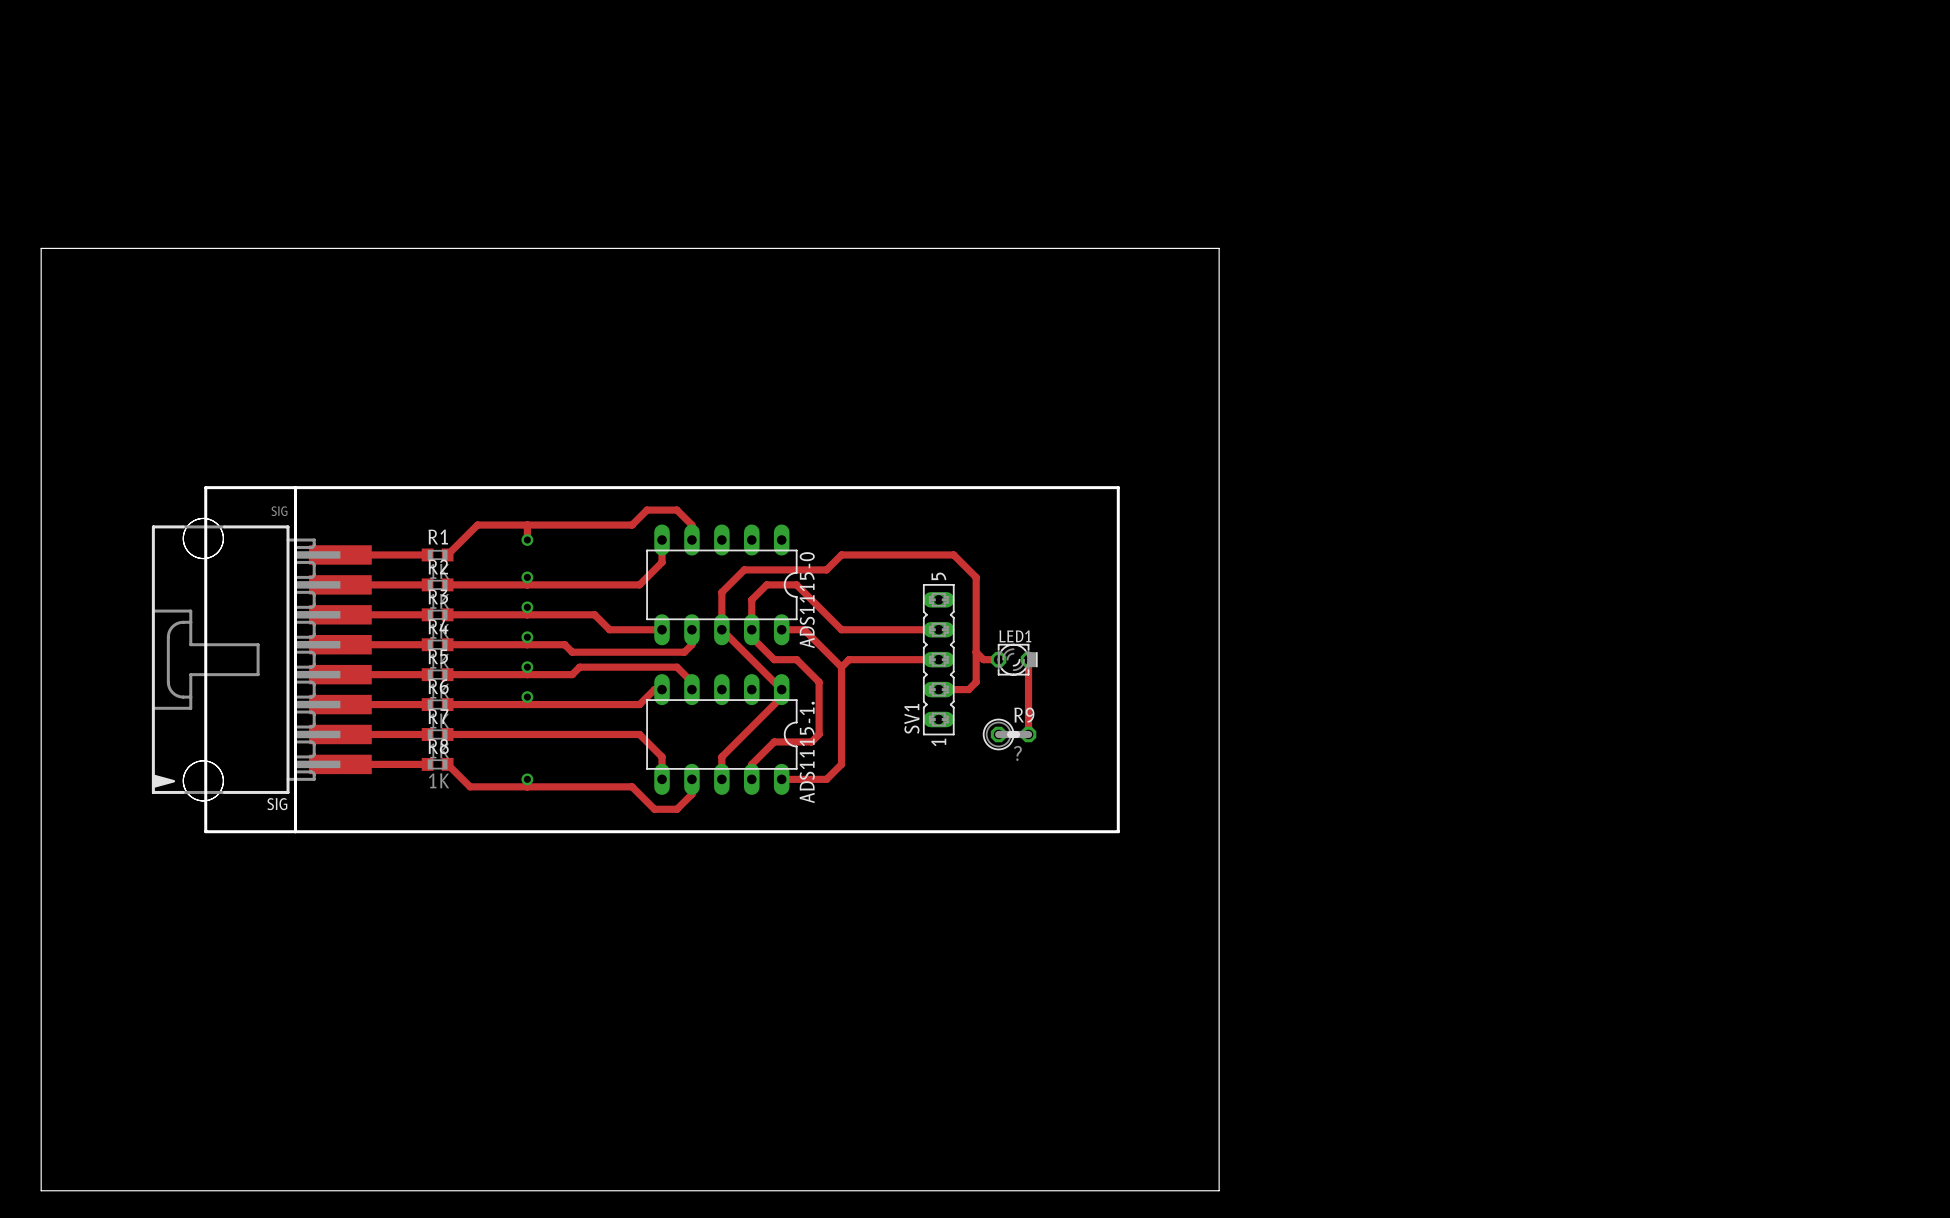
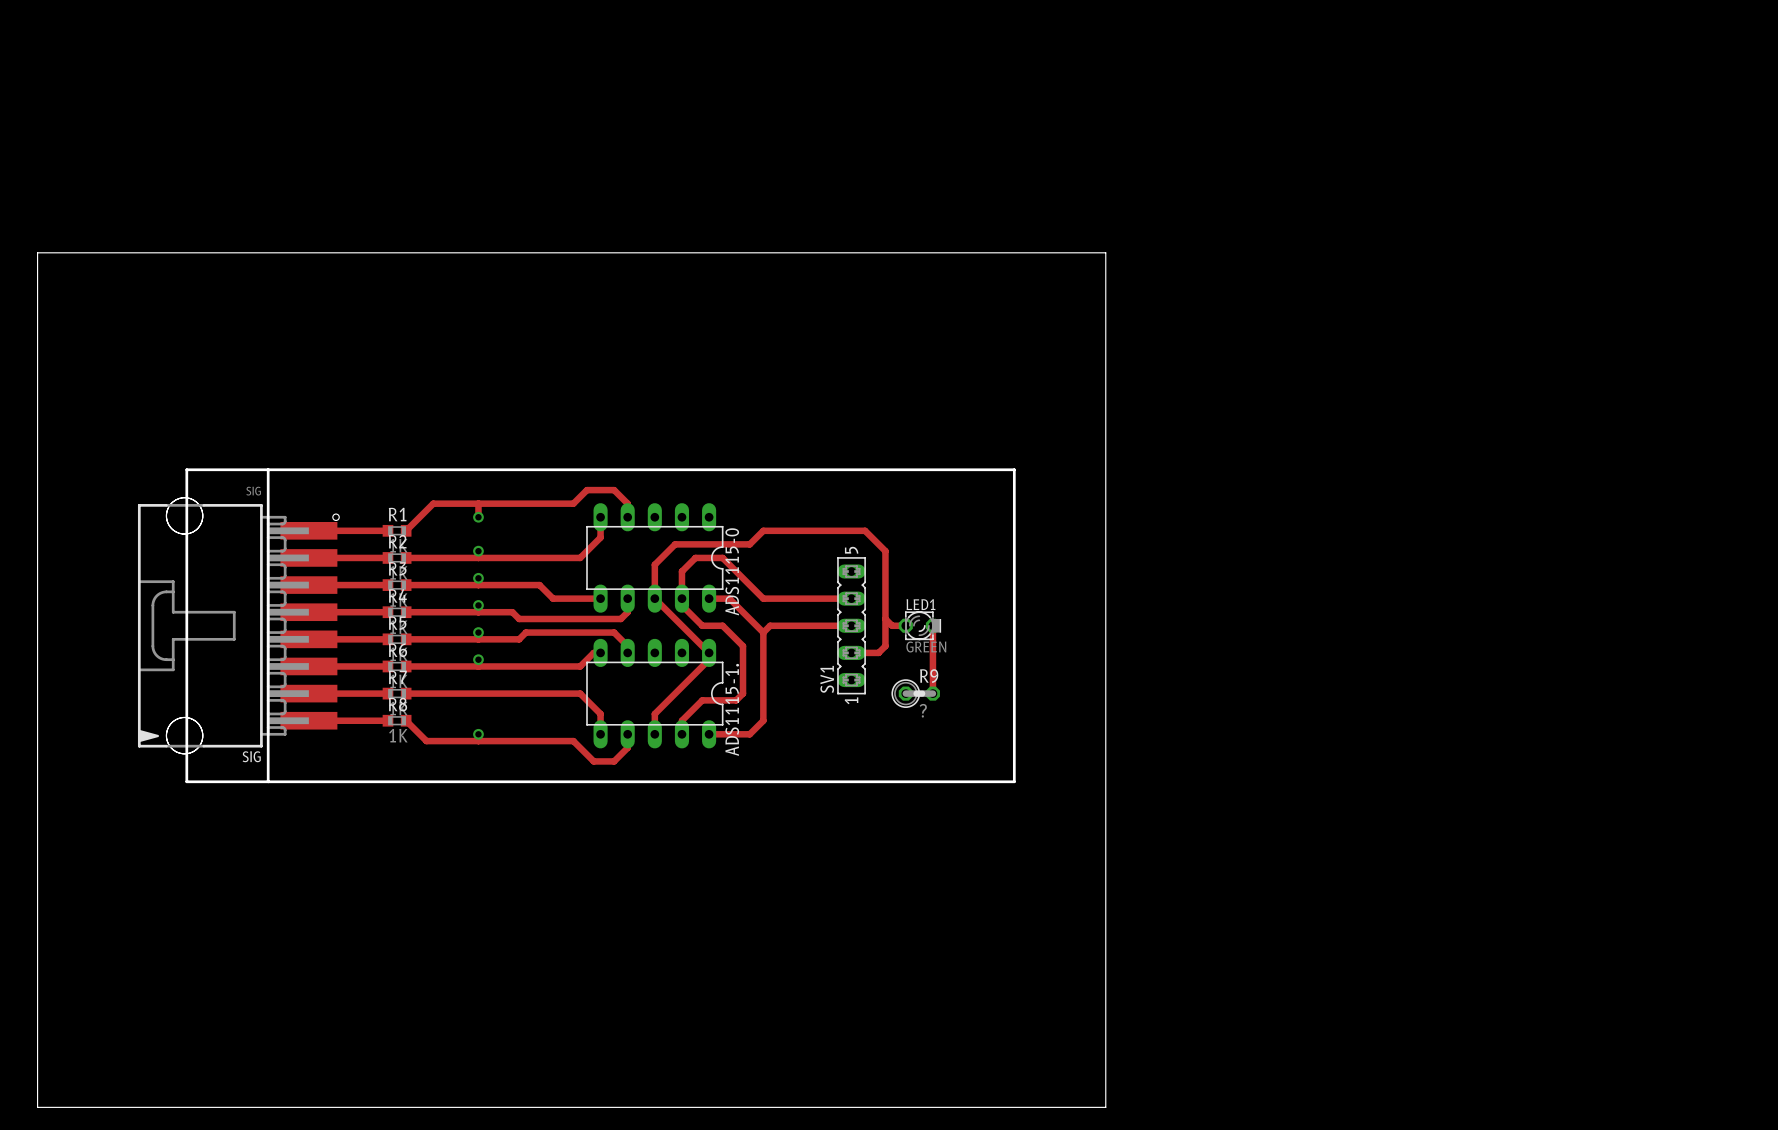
hole: none -> (336, 517)
LED1 value: none -> GREEN (926, 647)

